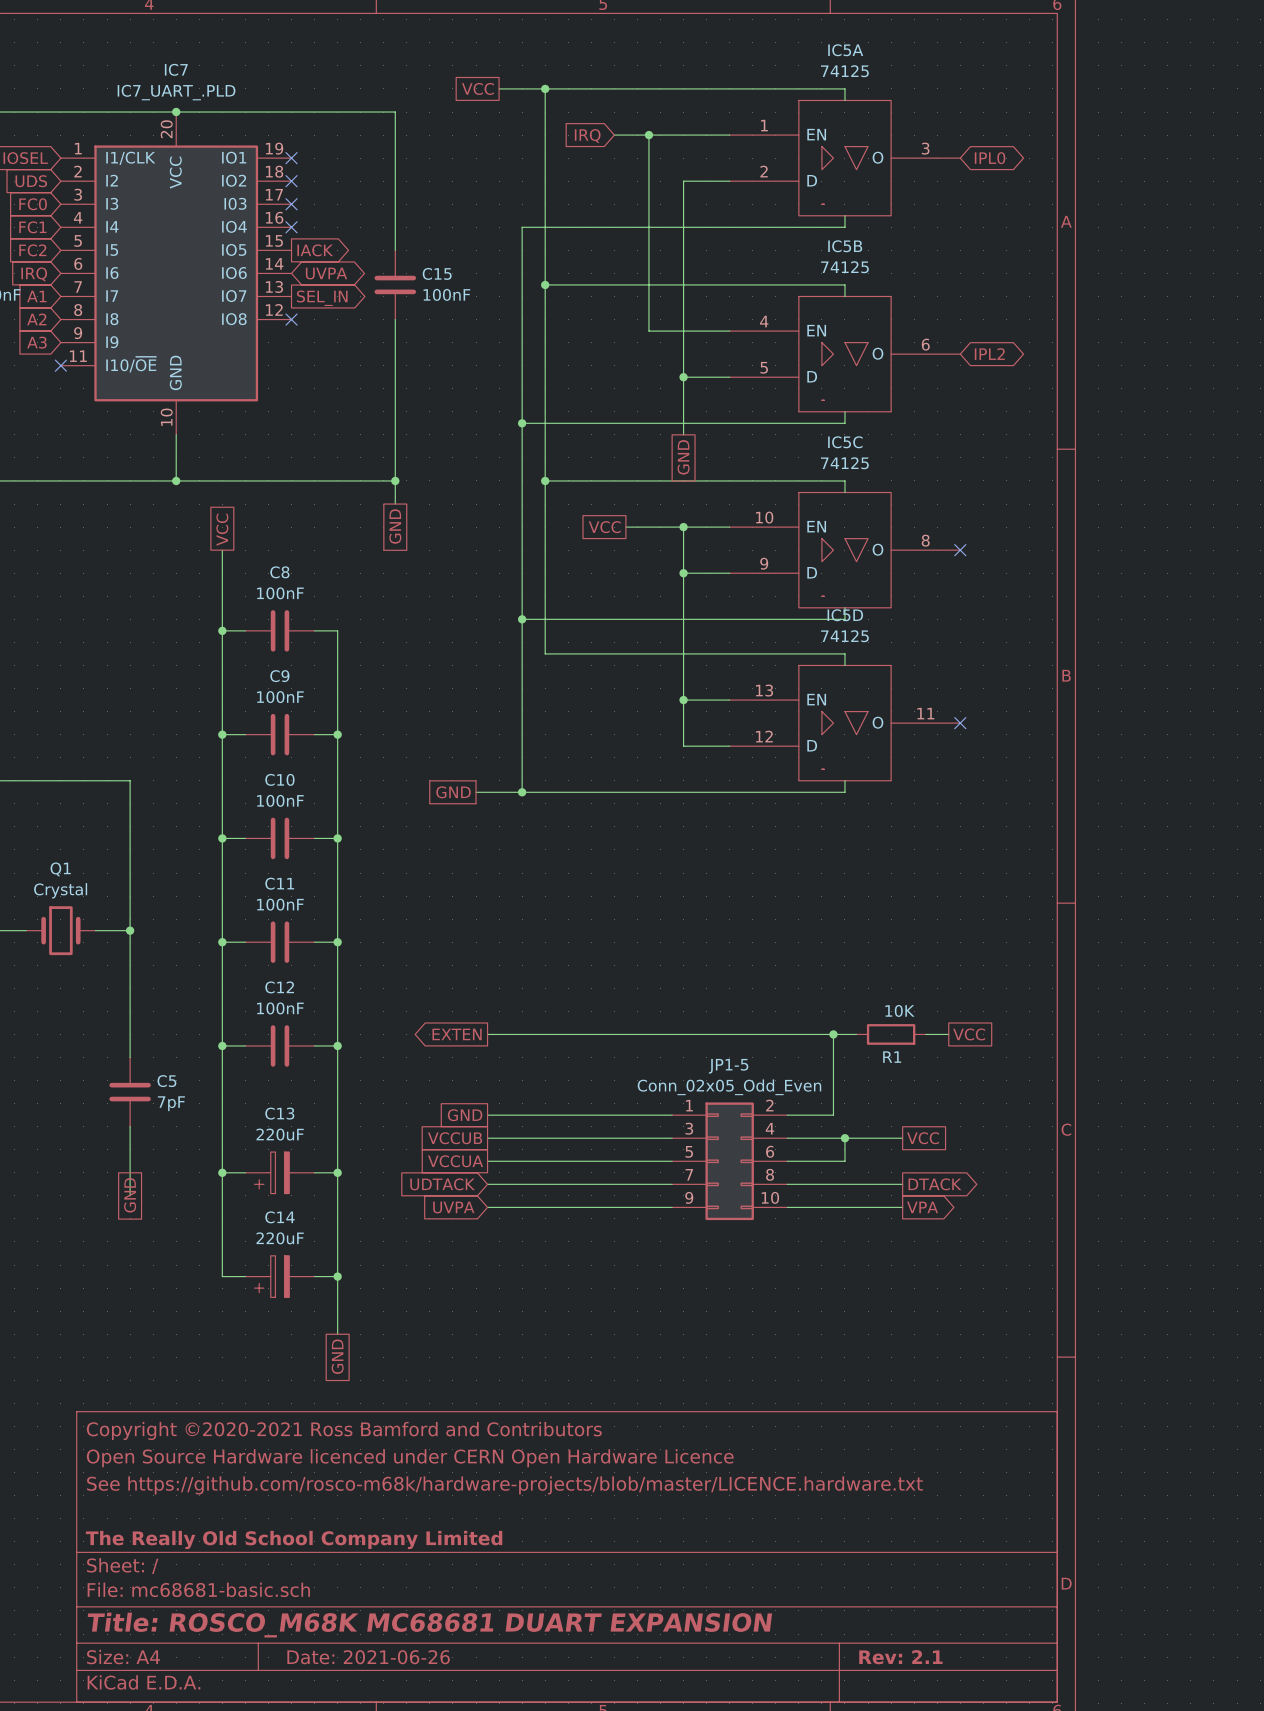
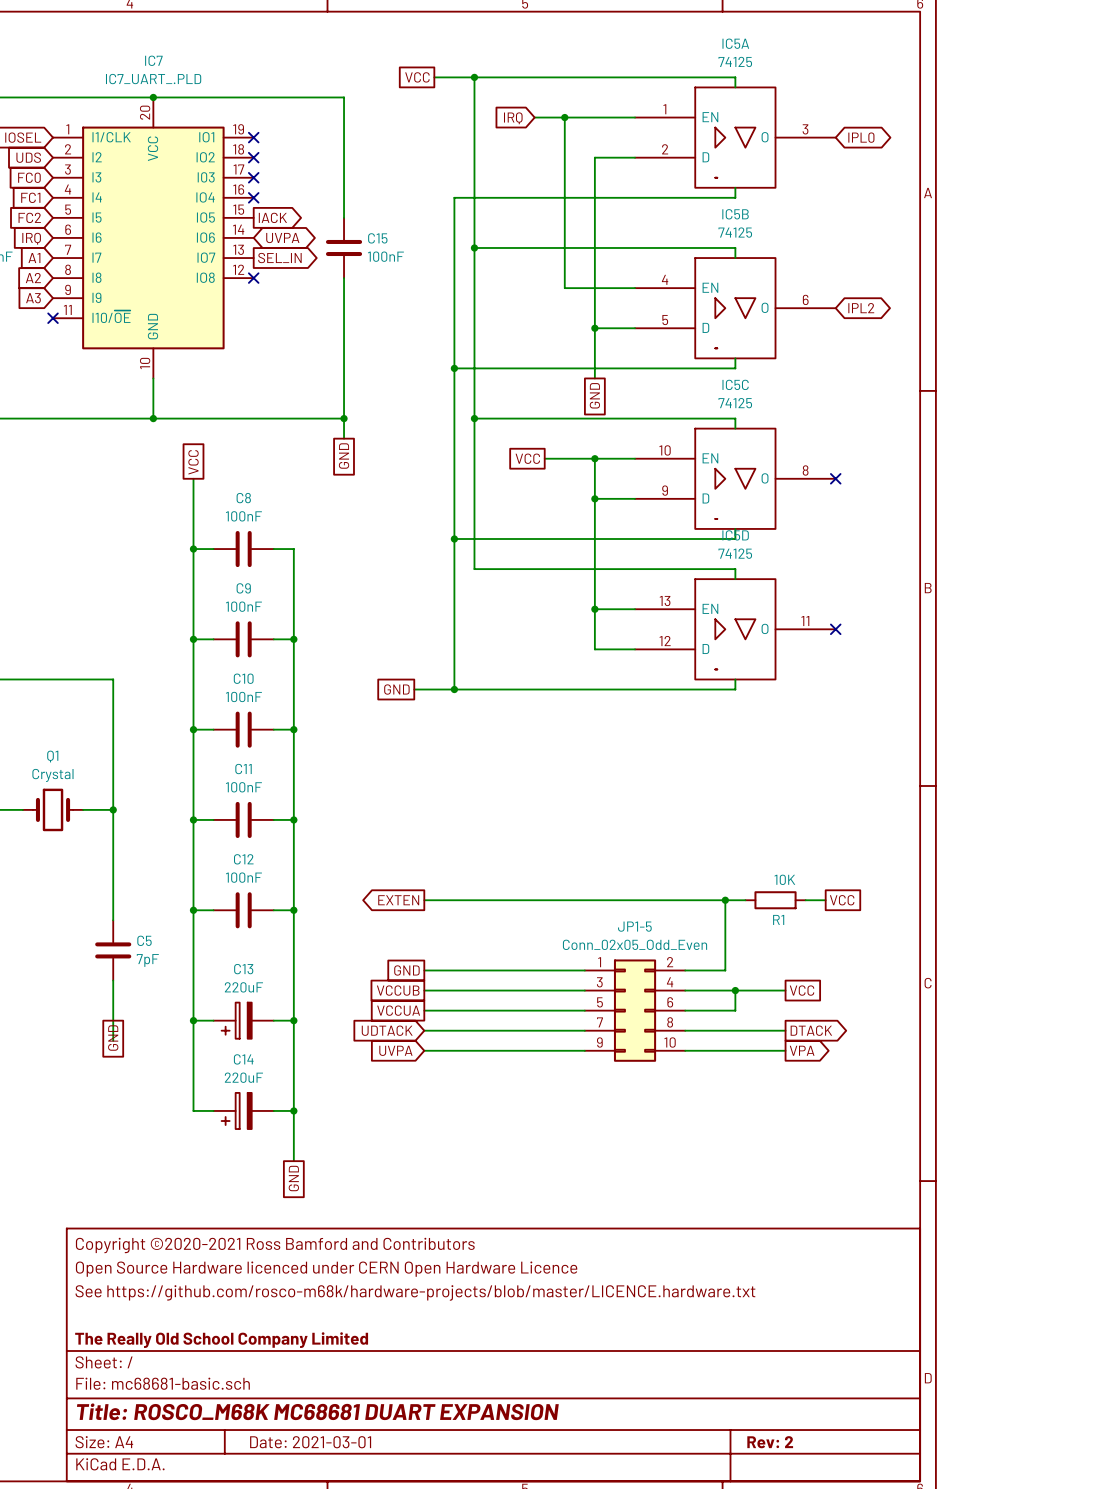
title block: Date: 2021-06-26 (368, 1657) -> Date: 2021-03-01 (310, 1442)
title block: Rev: 2.1 (900, 1657) -> Rev: 2 (770, 1442)

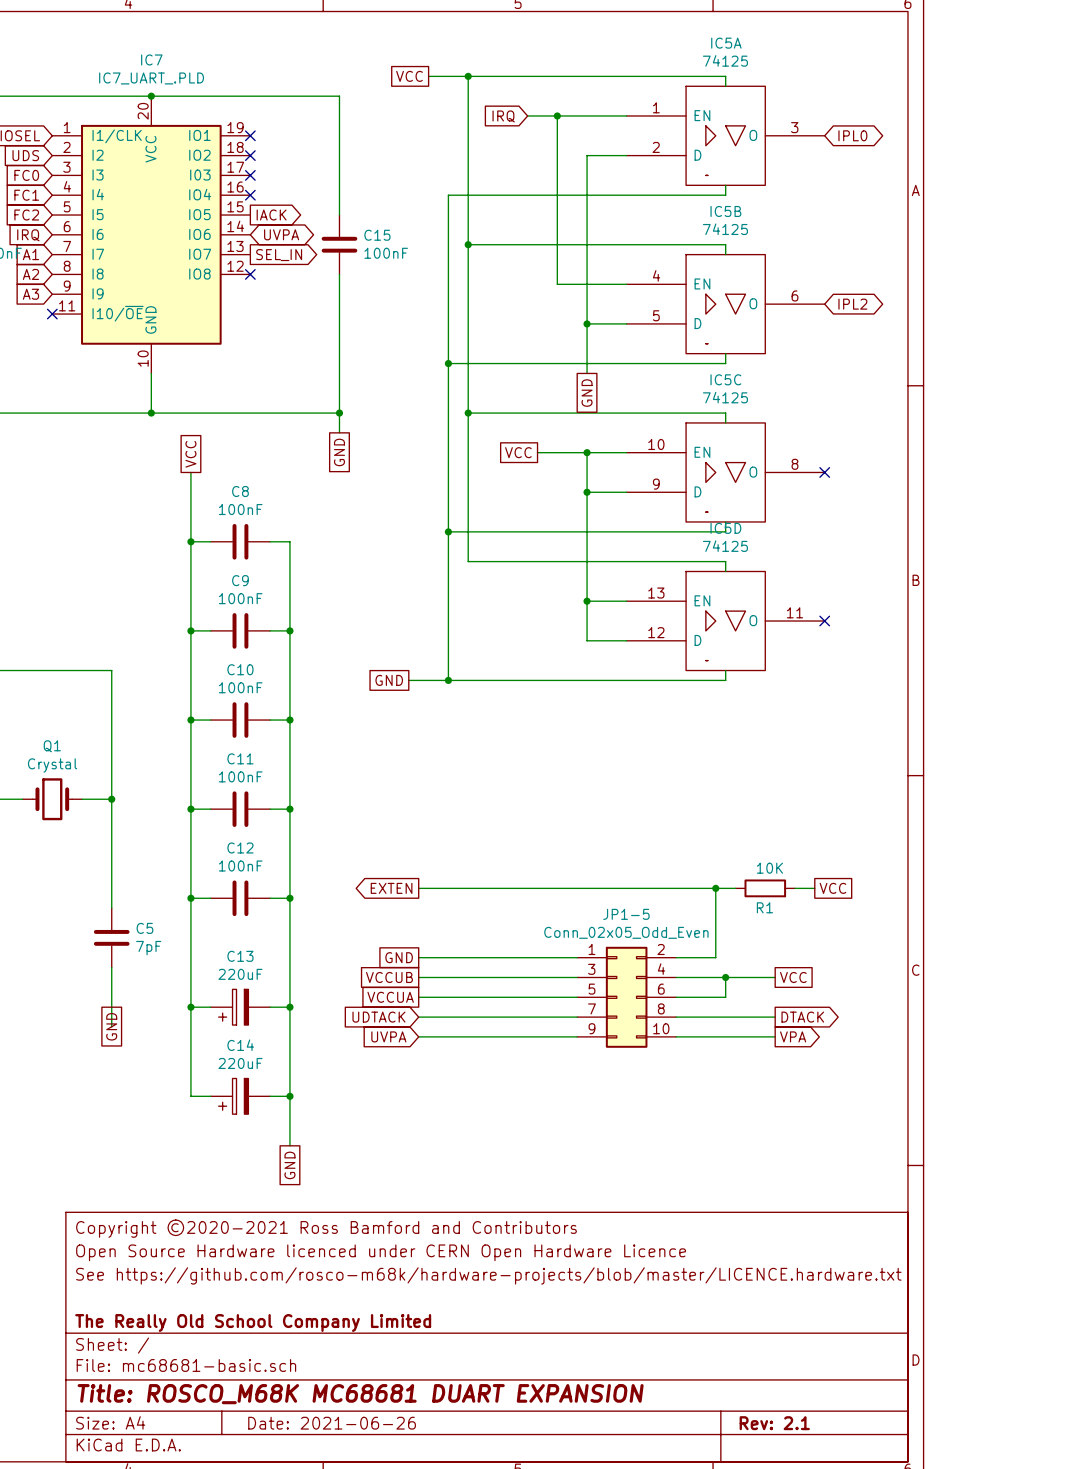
title block: Date: 2021-03-01 (310, 1442) -> Date: 2021-06-26 (332, 1423)
title block: Rev: 2 (770, 1442) -> Rev: 2.1 (774, 1423)

